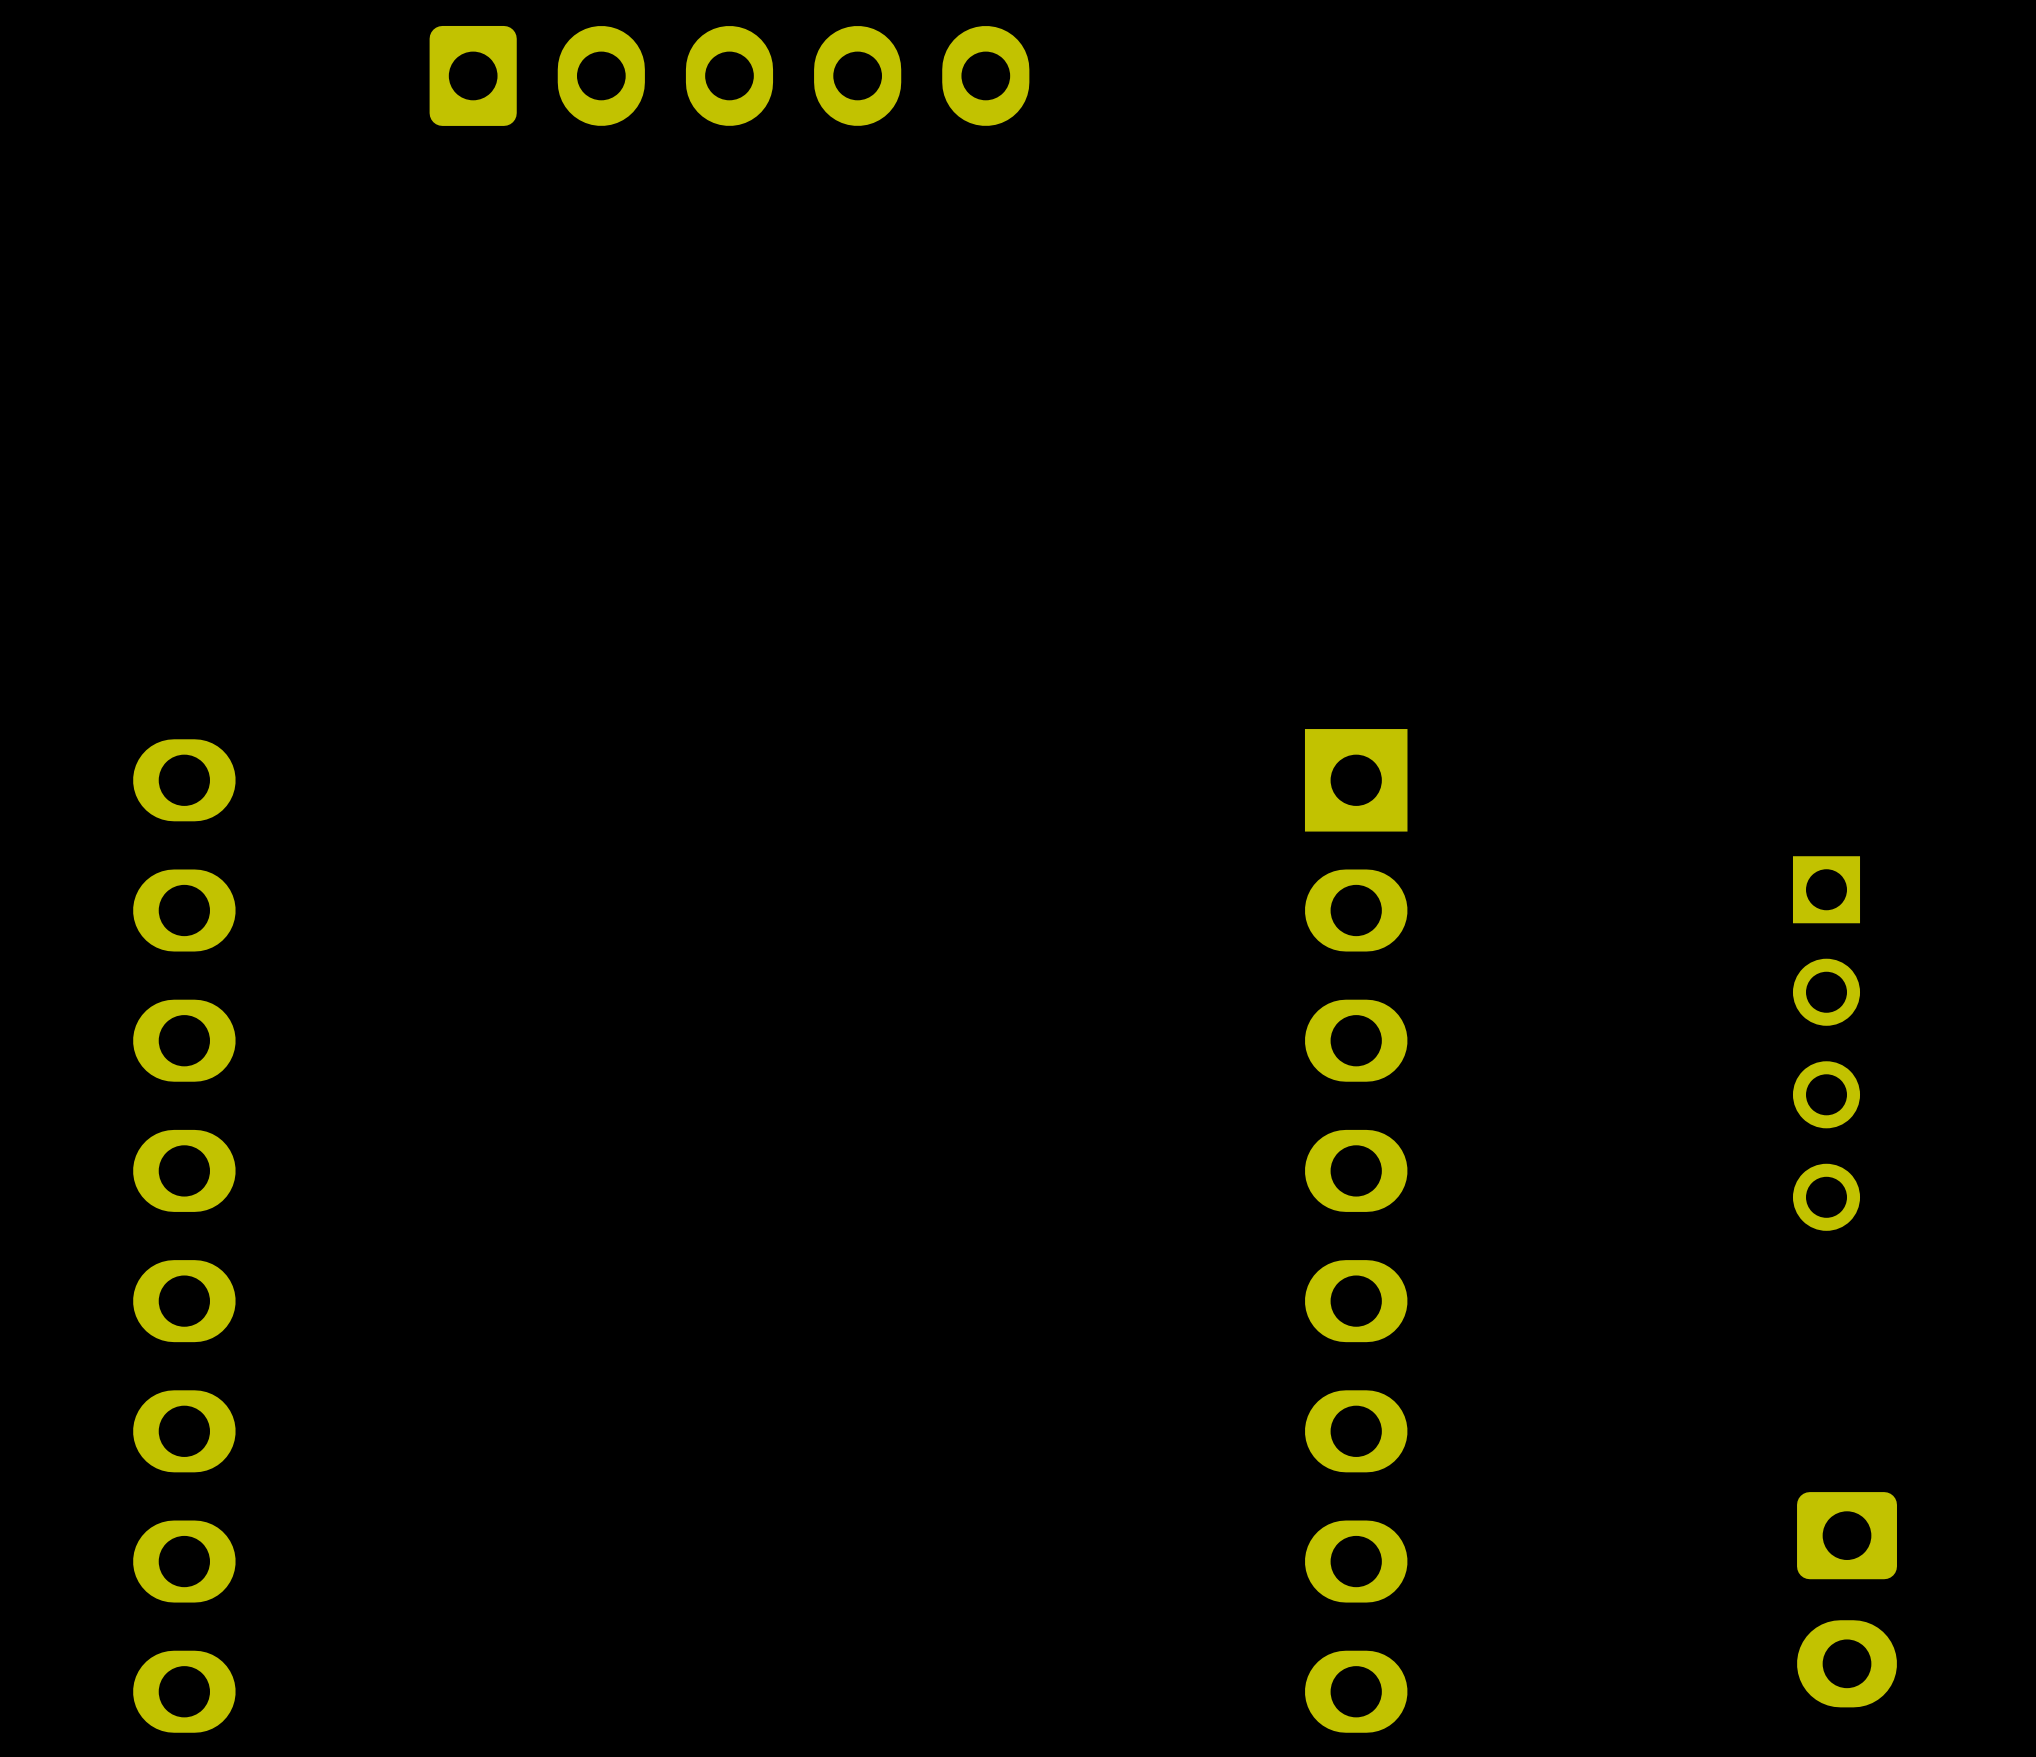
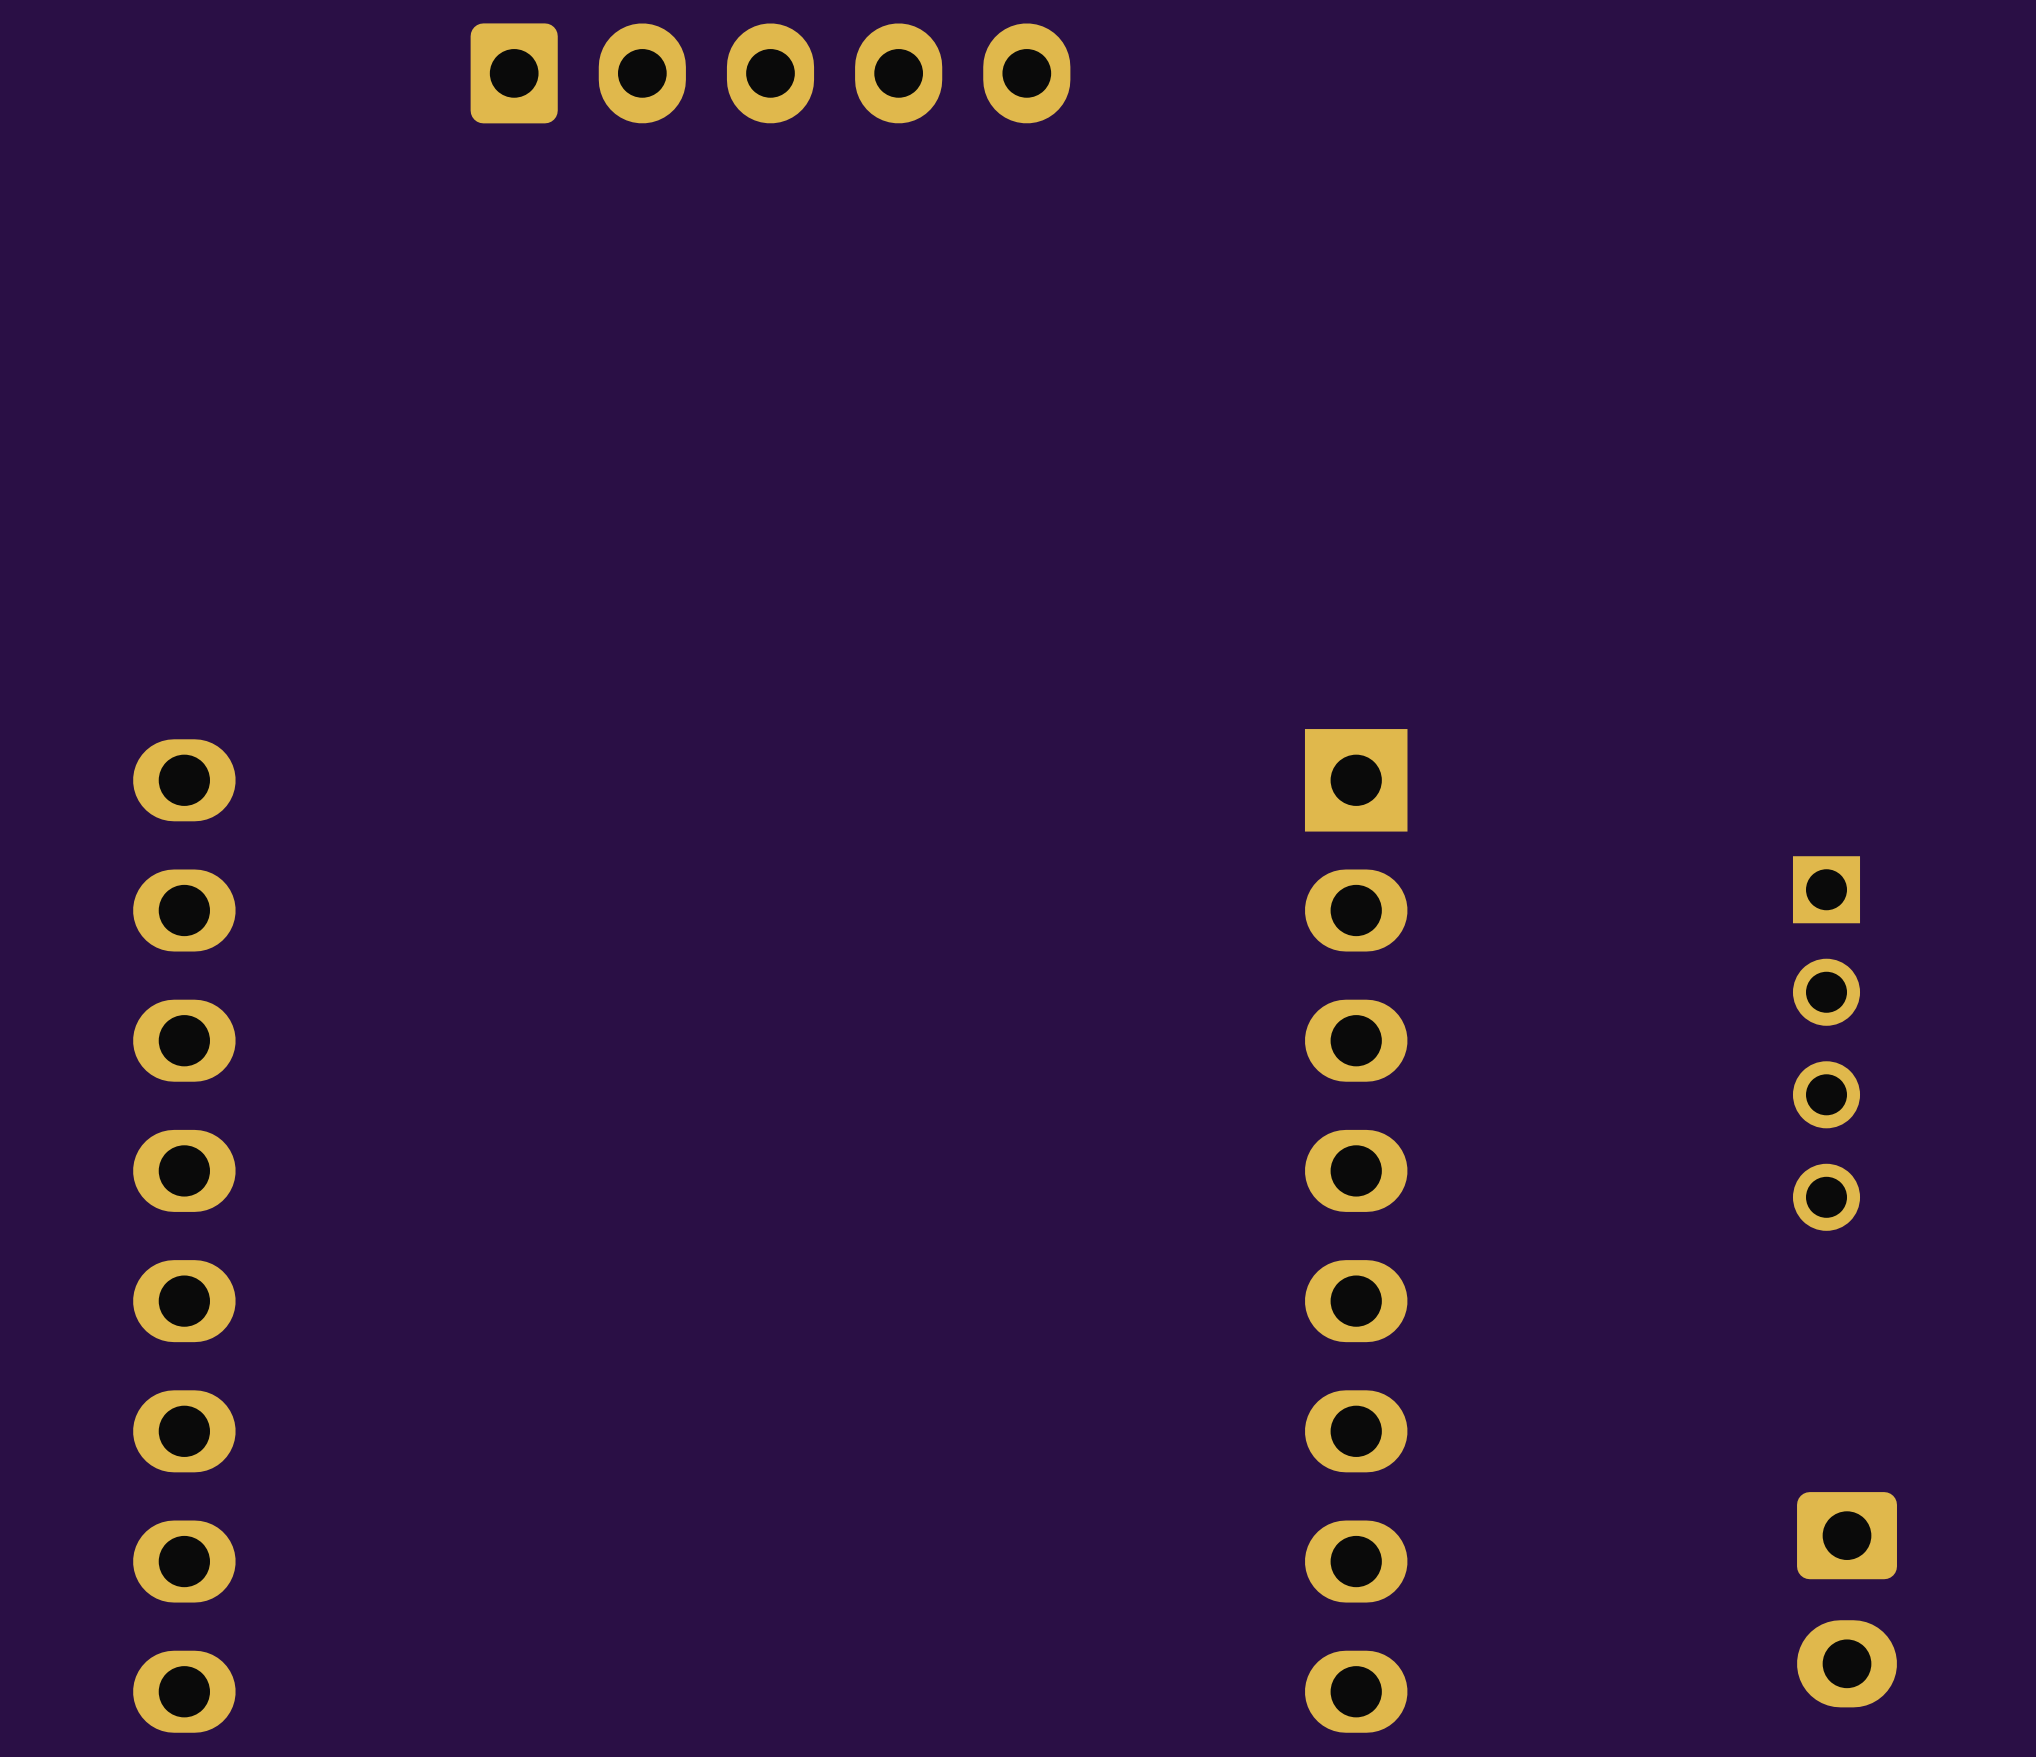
part position: (729, 75) -> (770, 73)

